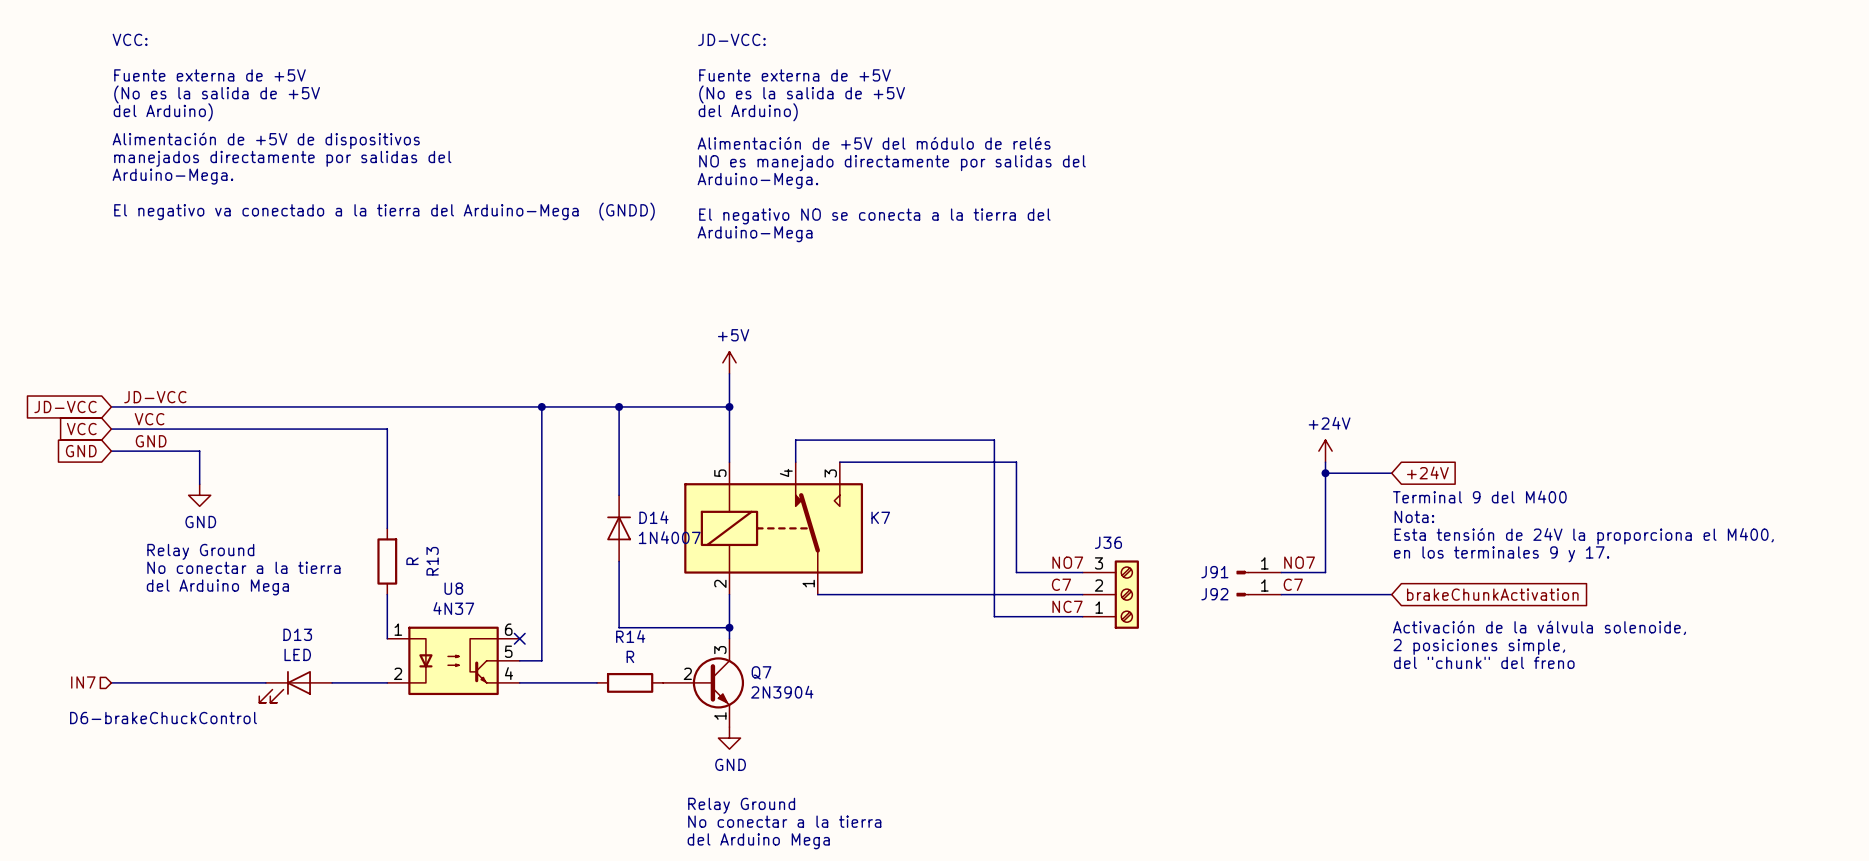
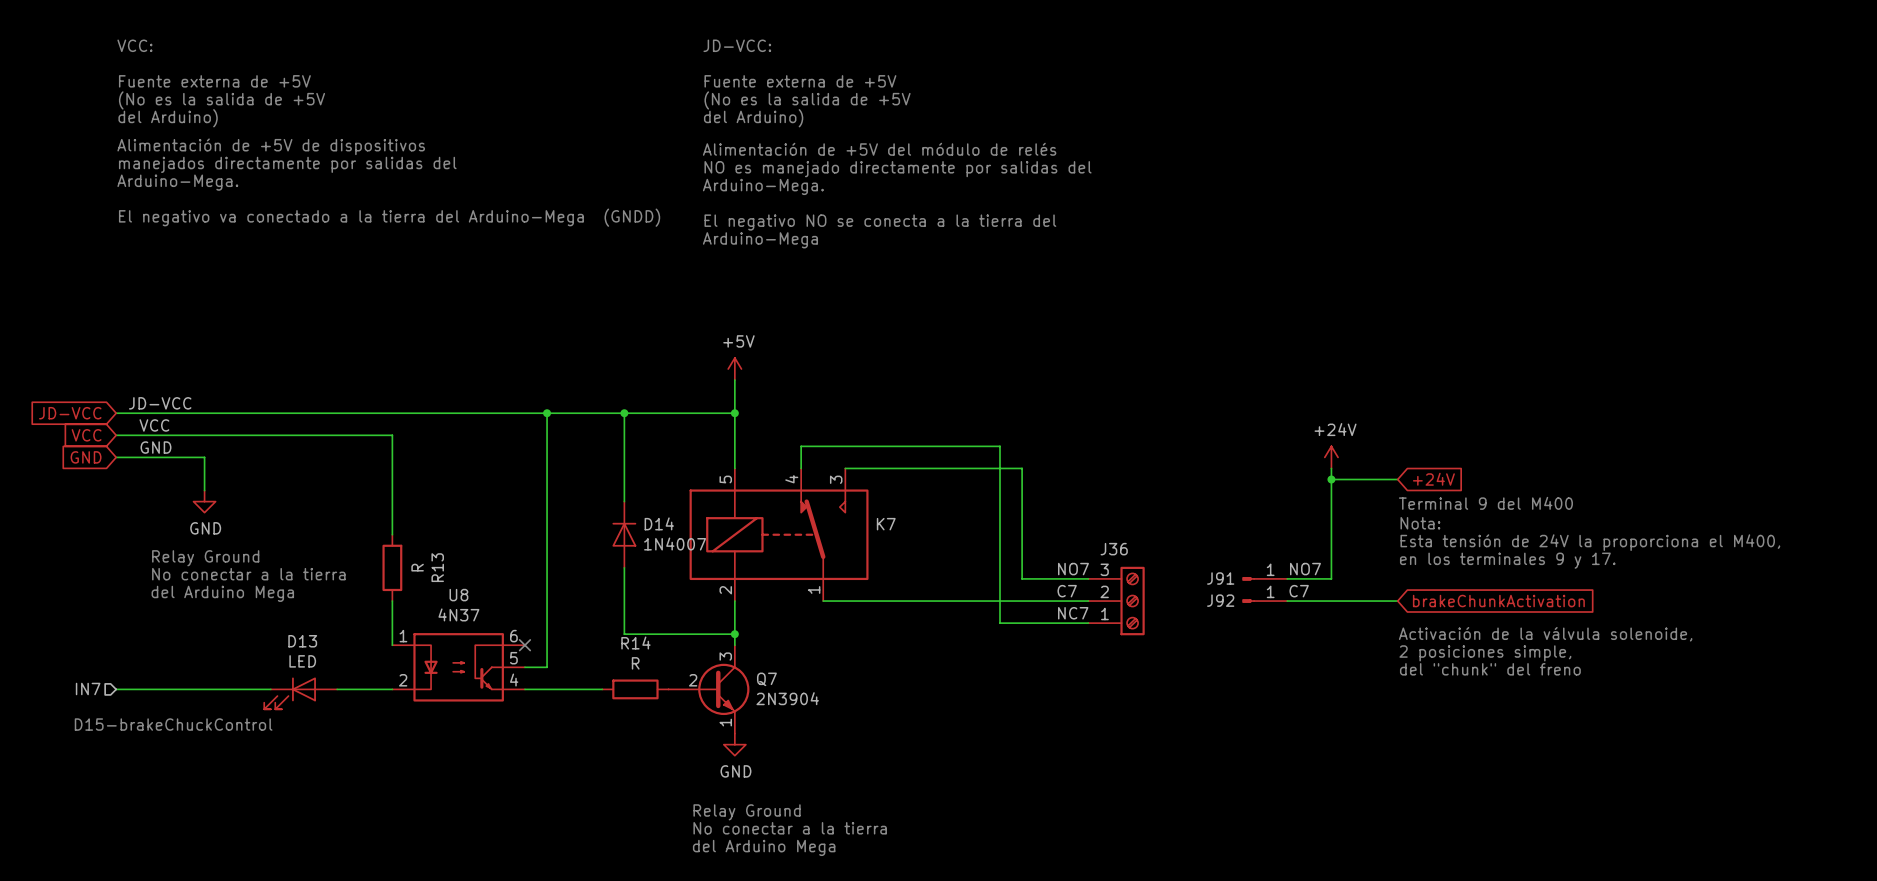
text: D6-brakeChuckControl (163, 718) -> D15-brakeChuckControl (173, 724)

